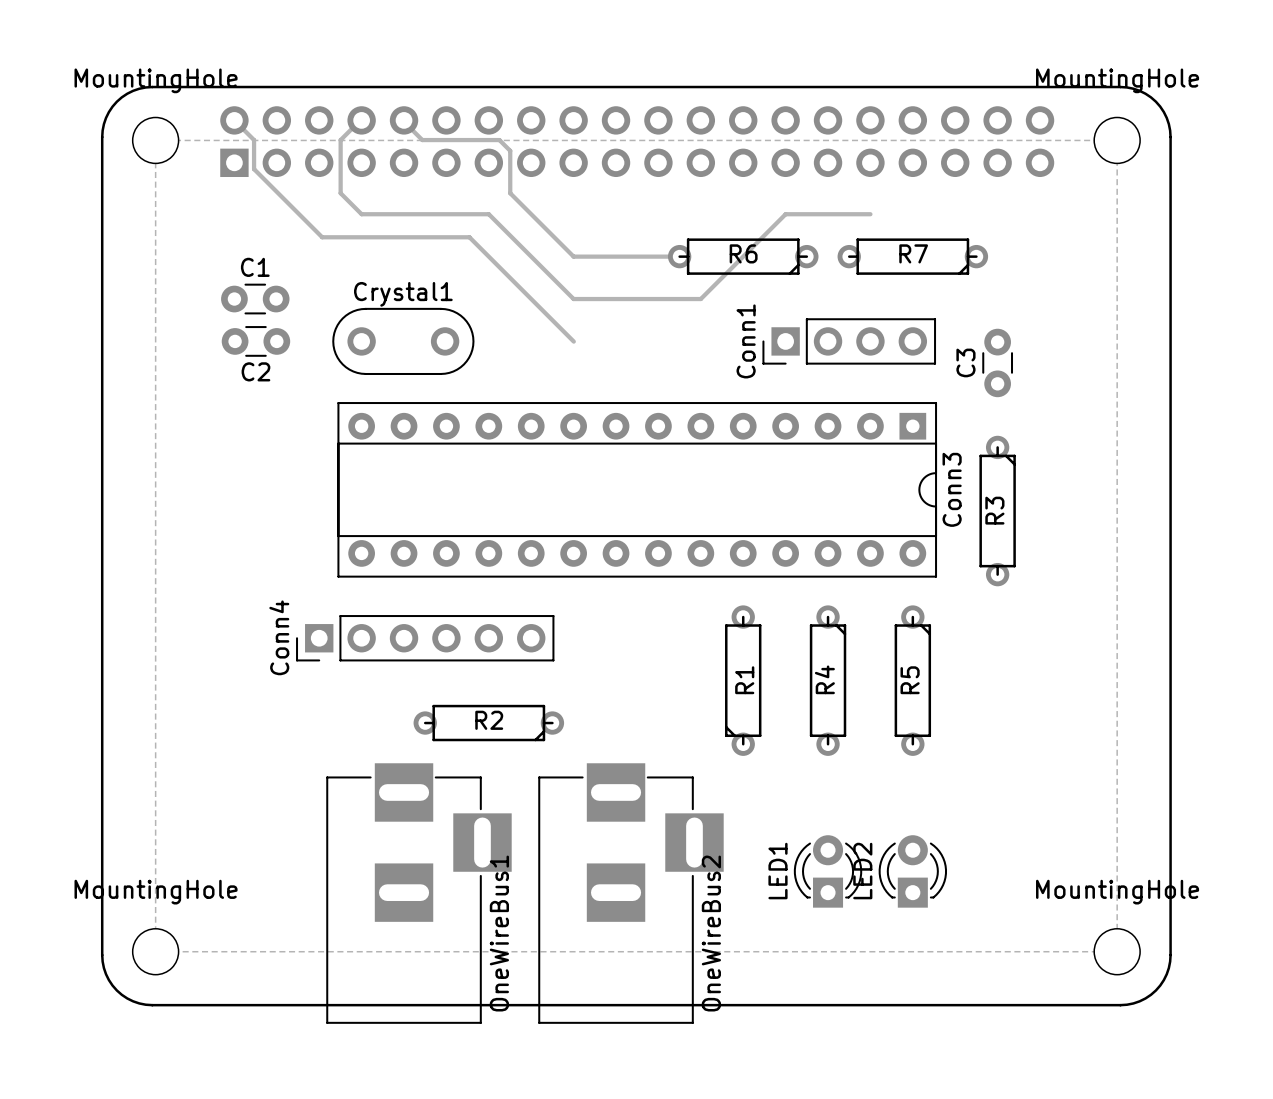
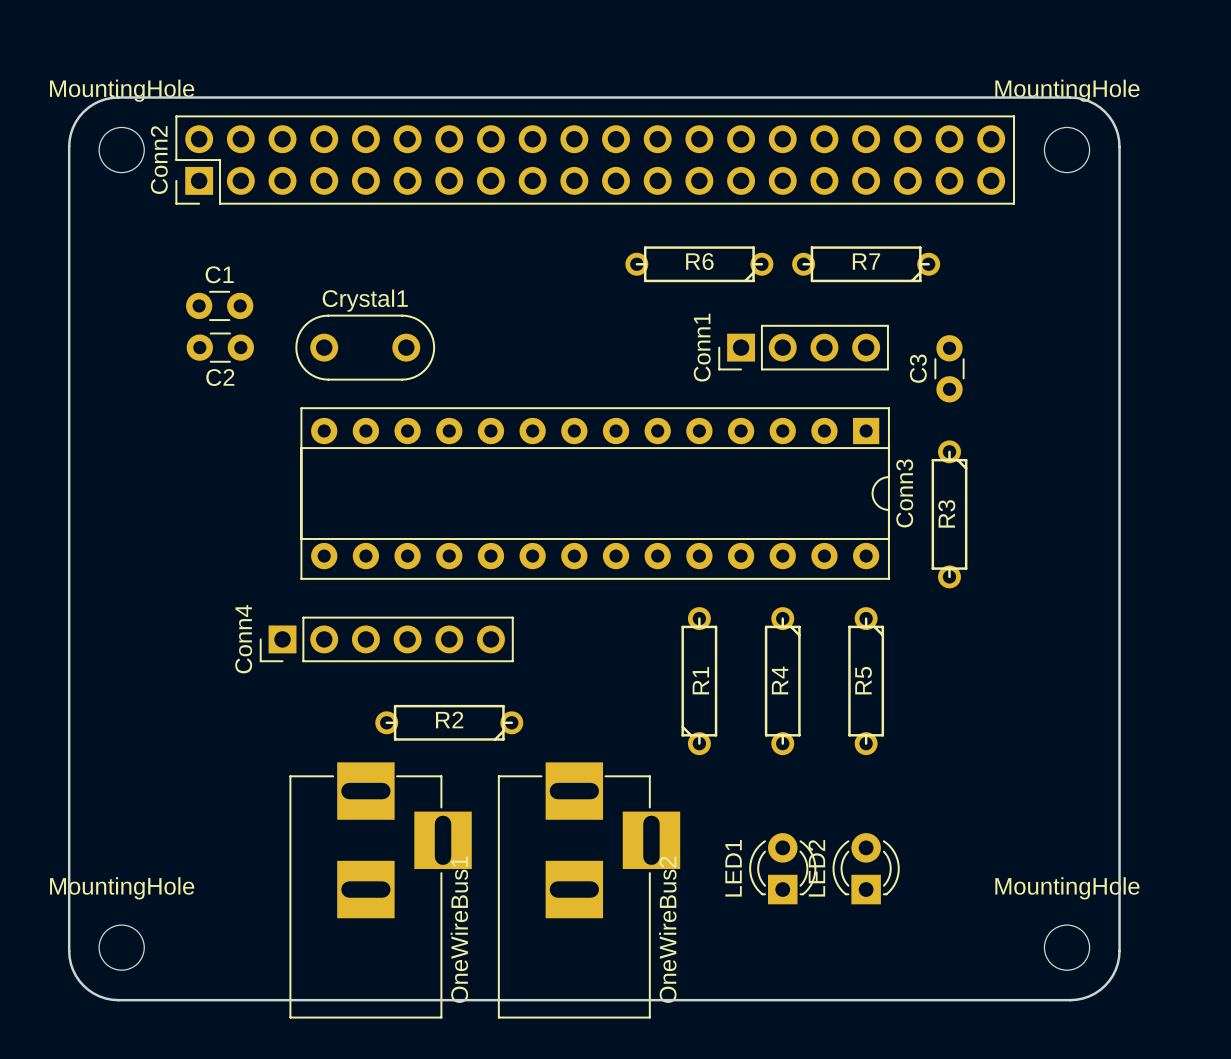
track: (234, 120) (254, 140) (254, 169) (322, 237) (469, 237) (573, 341) -> none
track: (360, 120) (340, 140) (340, 193) (361, 214) (488, 214) (573, 299) (700, 299) (785, 214) (870, 214) -> none
track: (402, 120) (422, 140) (499, 140) (510, 150) (510, 193) (573, 256) (679, 256) -> none
zone outline: (155, 140) (155, 951) (1117, 951) (1117, 140) (155, 140) -> none
part: (637, 141) -> none
Conn2: none -> (595, 160)

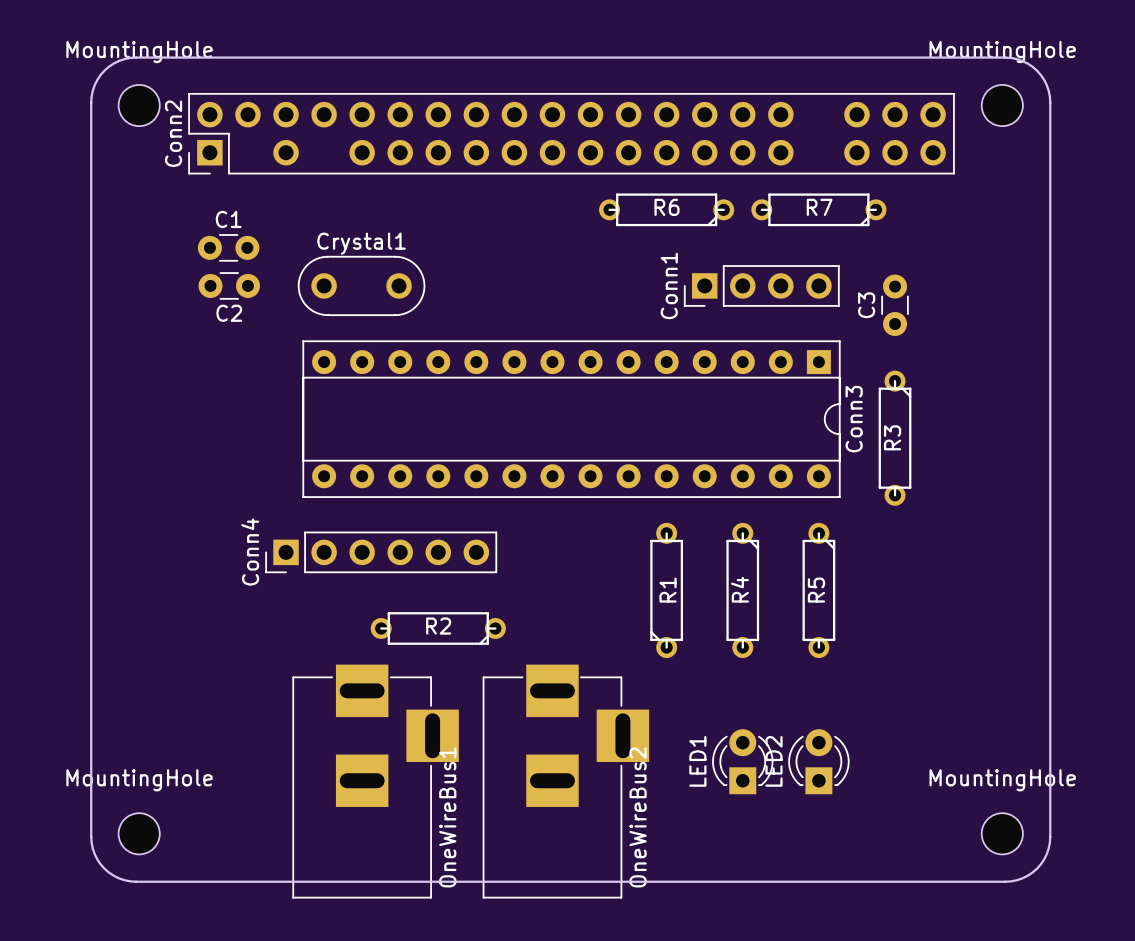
Conn2 footprint: [175, 115, 1015, 205] -> [188, 92, 955, 175]

